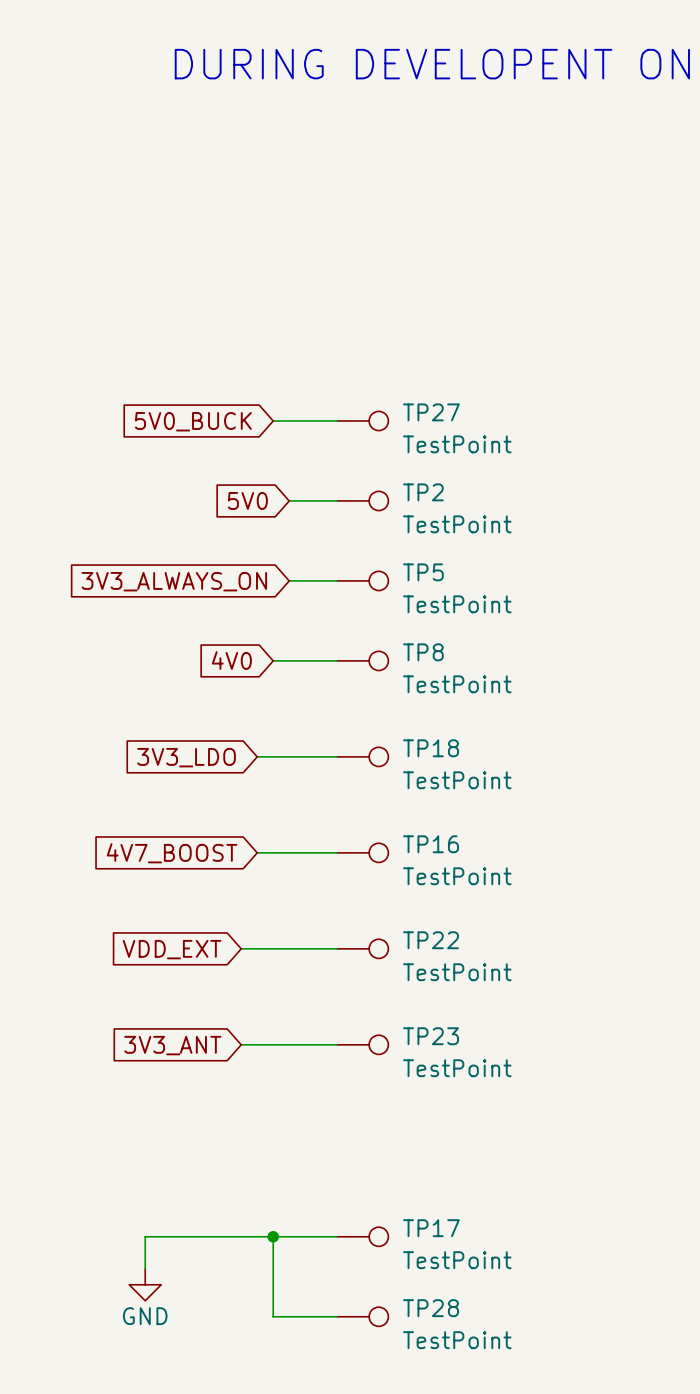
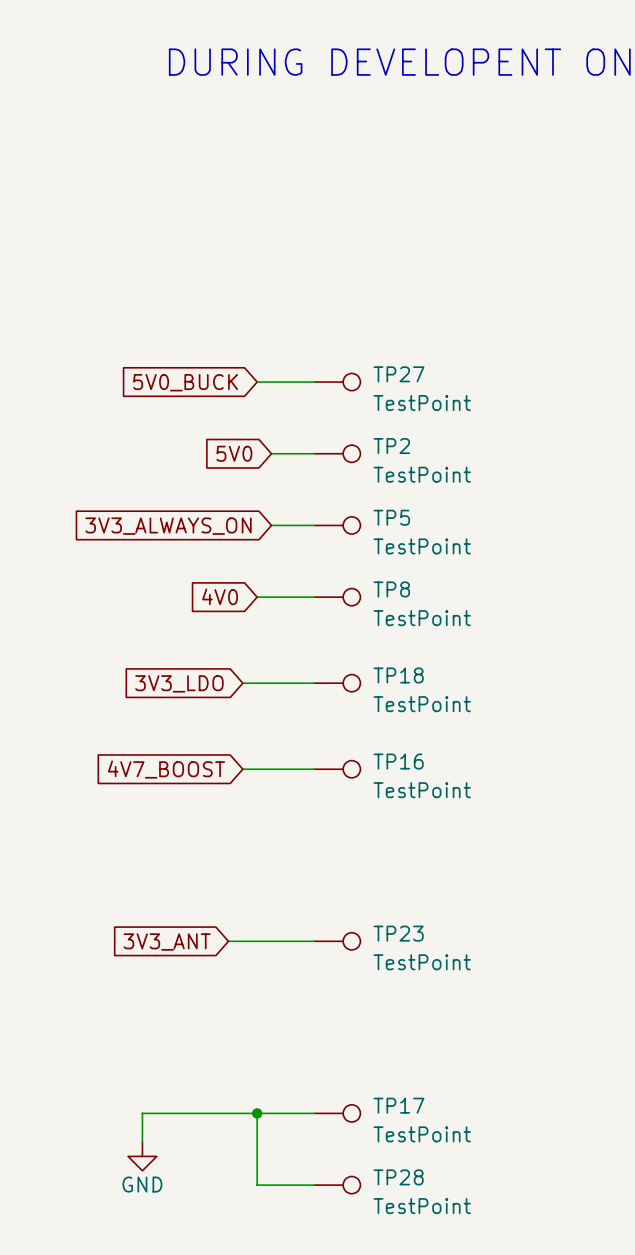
wire: (241, 948) (337, 948) -> none
TP22: TestPoint (362, 948) -> none
global label: VDD_EXT (172, 949) -> none

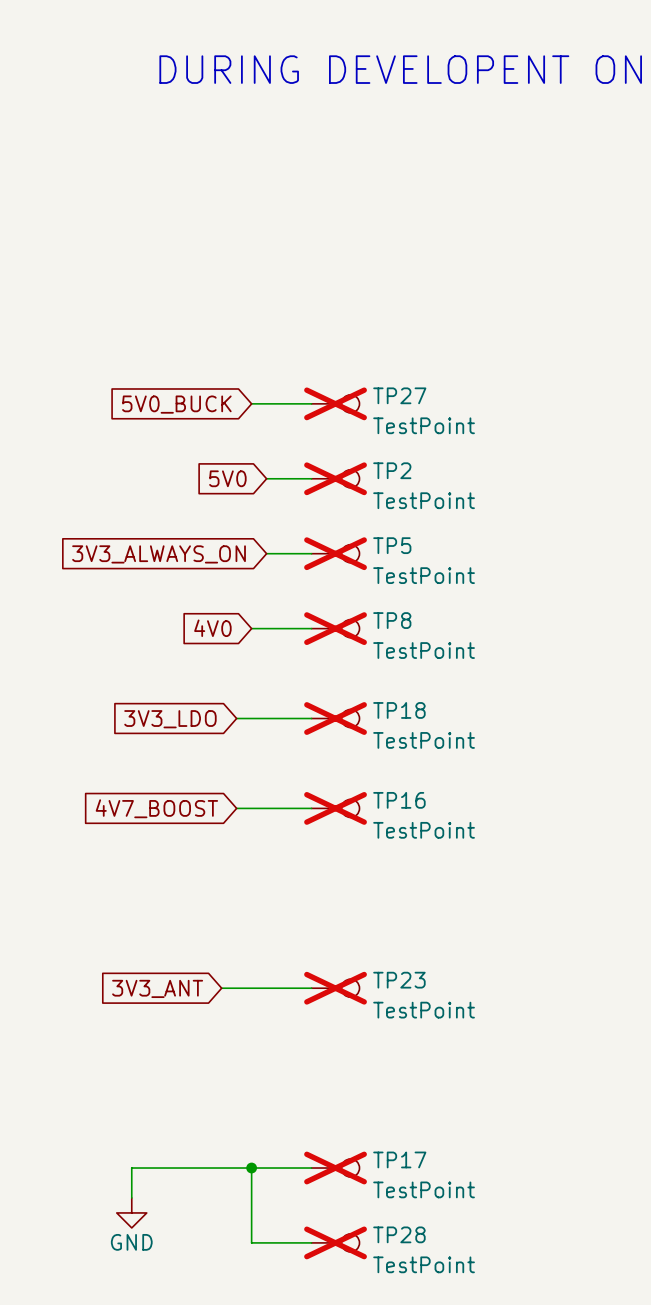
TP27 do-not-place cross: none -> (335, 403)
TP2 do-not-place cross: none -> (335, 478)
TP5 do-not-place cross: none -> (335, 553)
TP8 do-not-place cross: none -> (335, 628)
TP18 do-not-place cross: none -> (335, 718)
TP16 do-not-place cross: none -> (335, 808)
TP23 do-not-place cross: none -> (335, 988)
TP17 do-not-place cross: none -> (335, 1168)
TP28 do-not-place cross: none -> (335, 1242)

